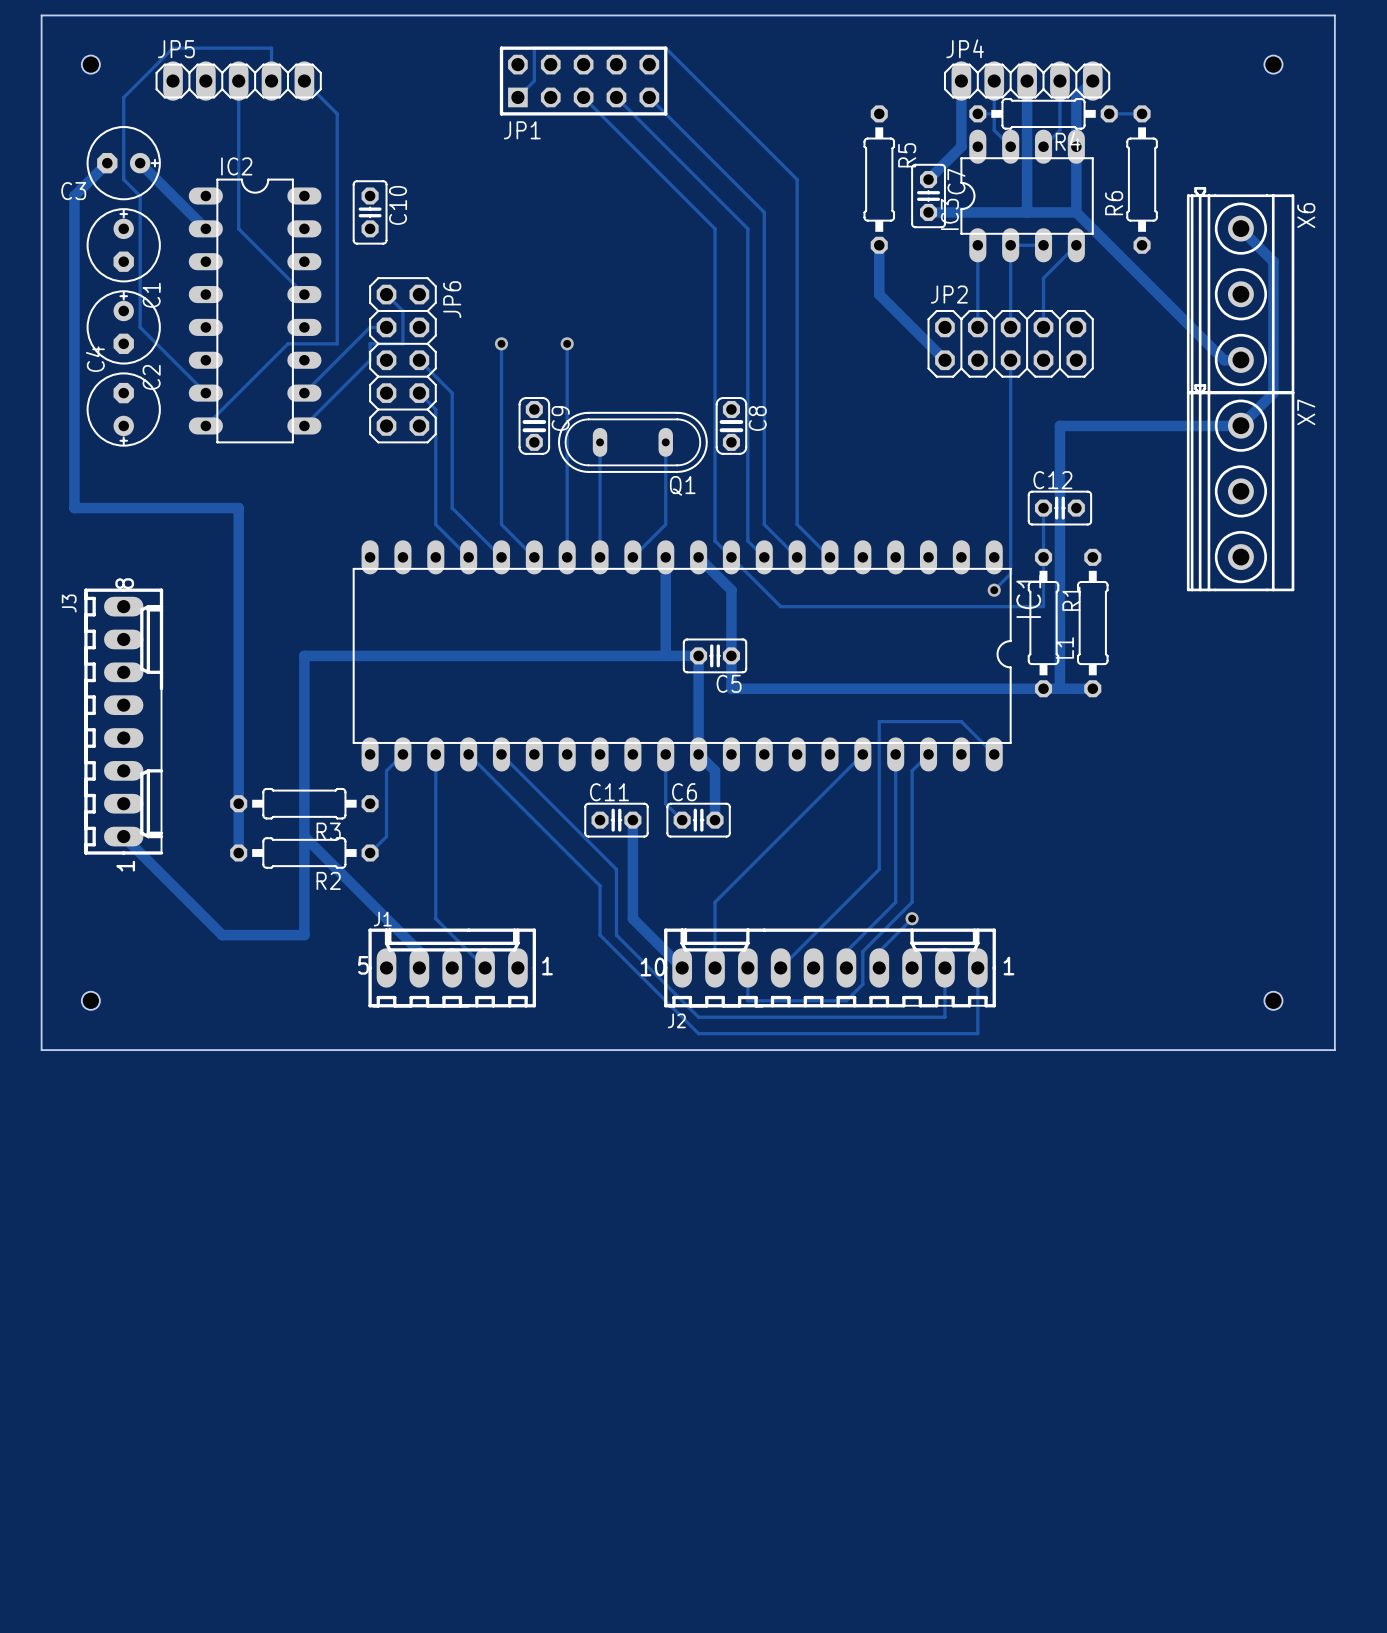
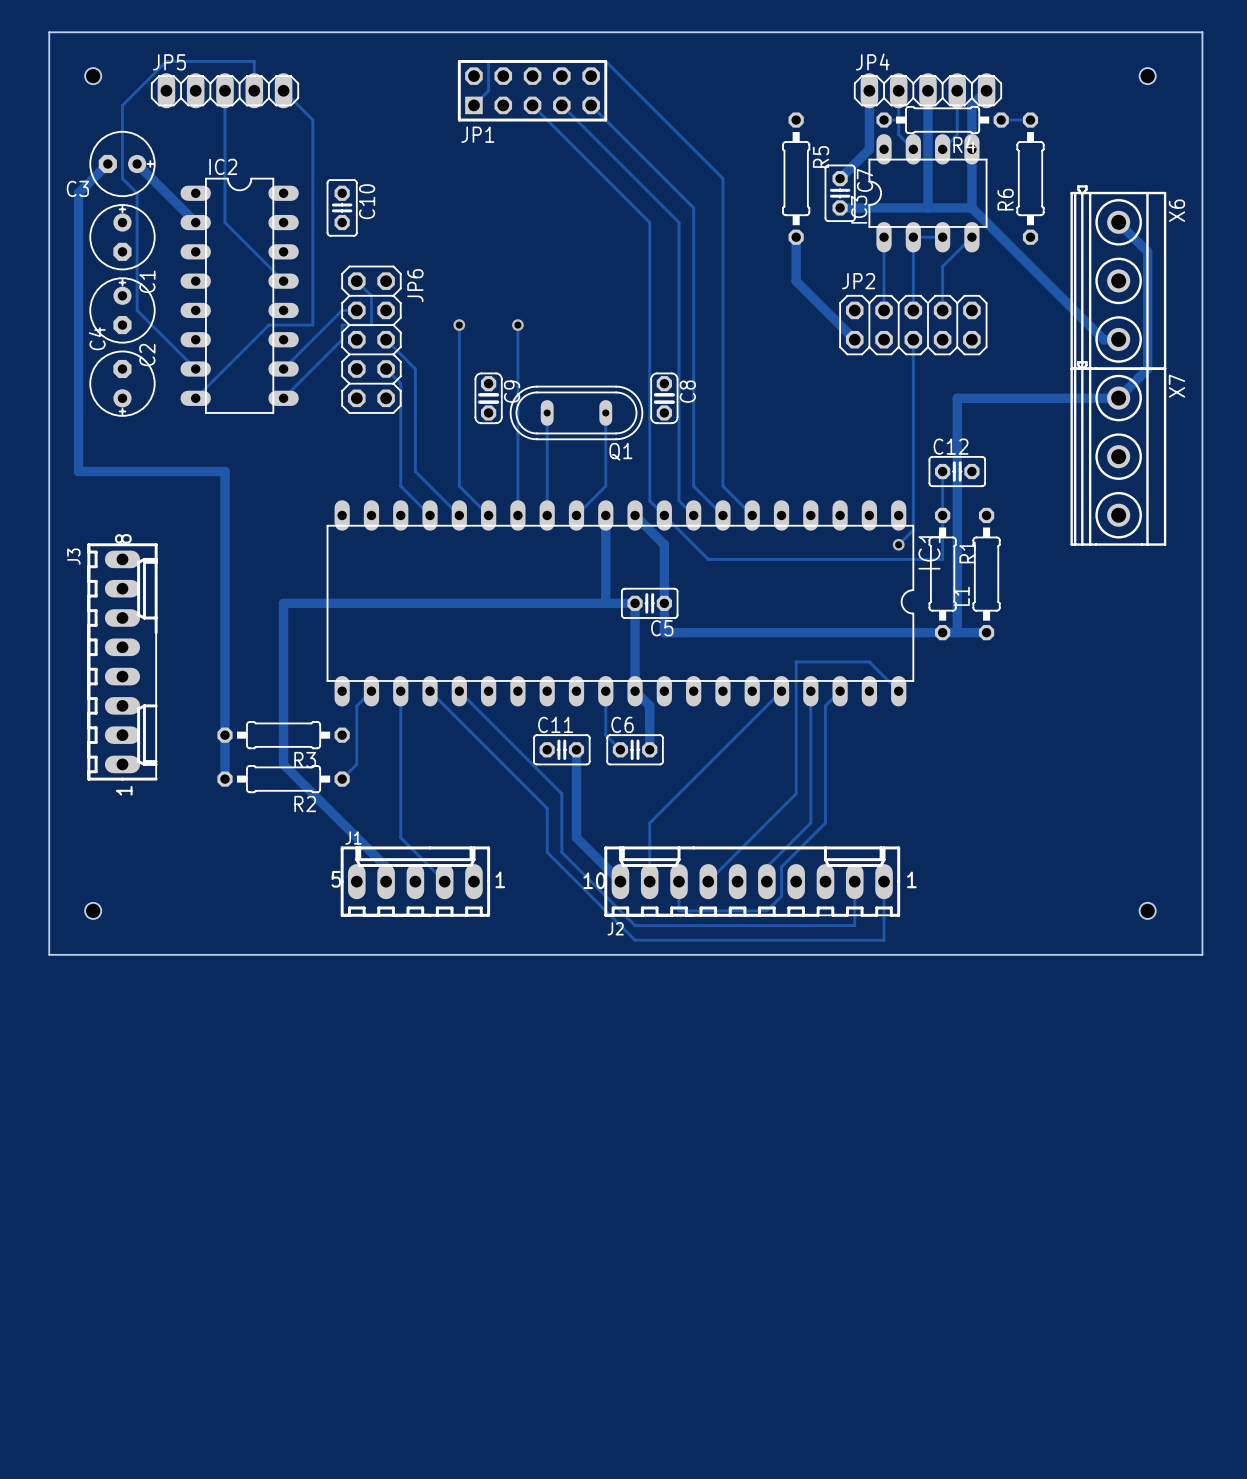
track: (123, 836) (222, 935) (304, 935) (304, 836) -> none
track: (912, 918) (879, 951) (879, 967) -> none
via: (912, 918) -> none

